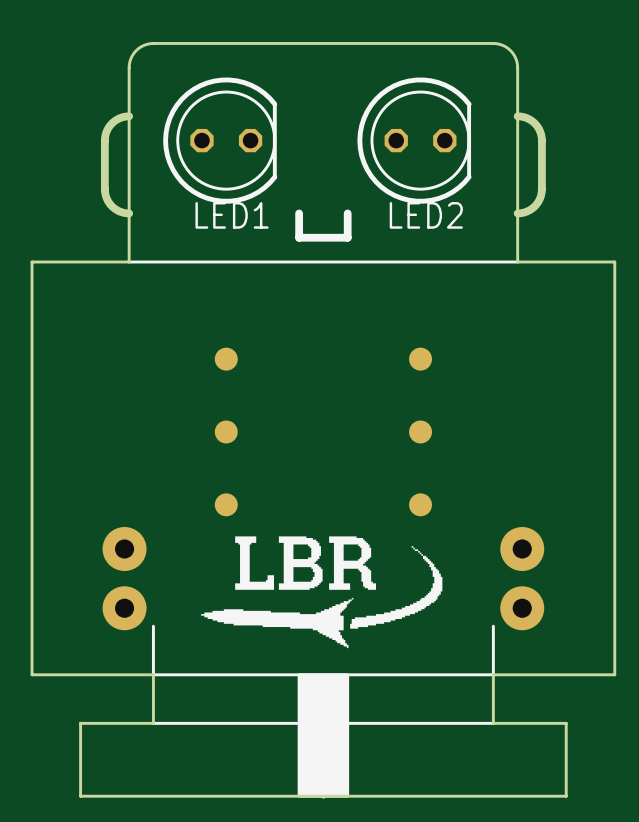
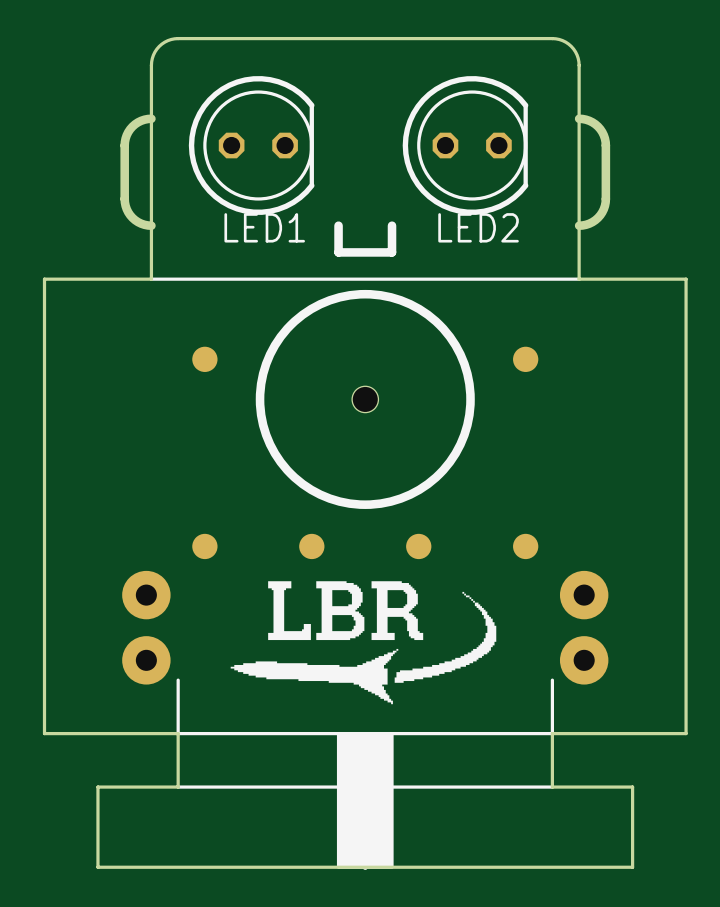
drawing: none -> [255, 289, 475, 509]
part: none -> (204, 359)
part: none -> (525, 359)
part: (226, 359) -> none
part: (420, 359) -> none
hole: none -> (365, 399)
part: (226, 431) -> none
part: (420, 431) -> none
part: none -> (204, 546)
part: (226, 504) -> none
part: none -> (311, 546)
part: none -> (418, 546)
part: (420, 504) -> none
part: none -> (525, 546)

